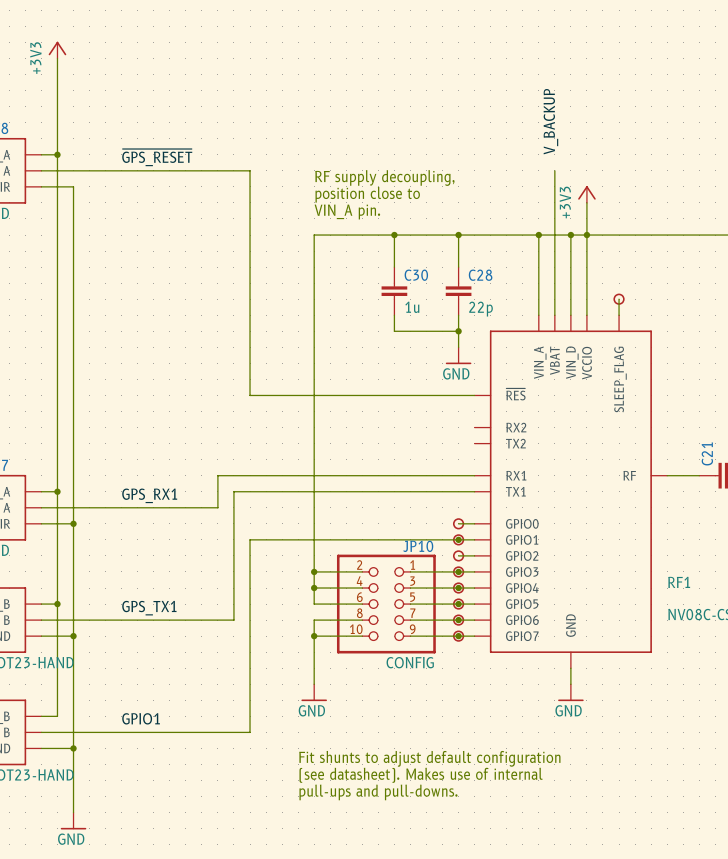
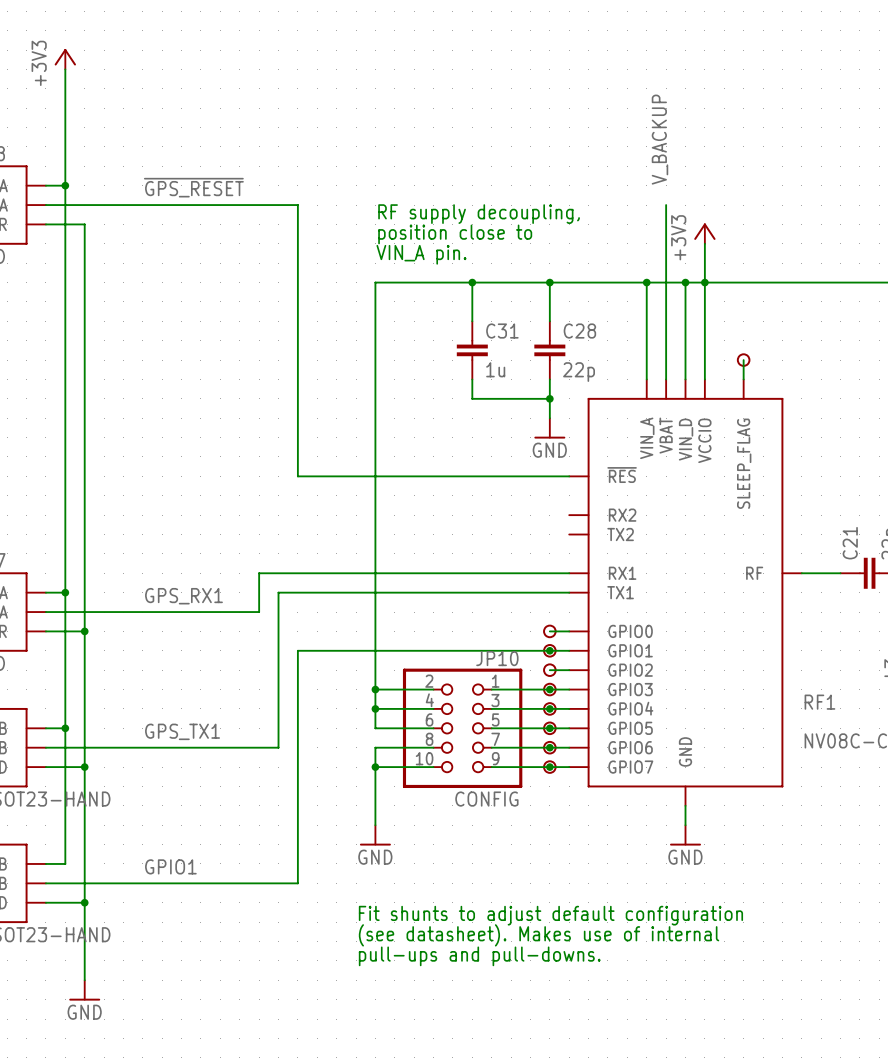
C30 name: C30 (416, 275) -> C31 (502, 331)

